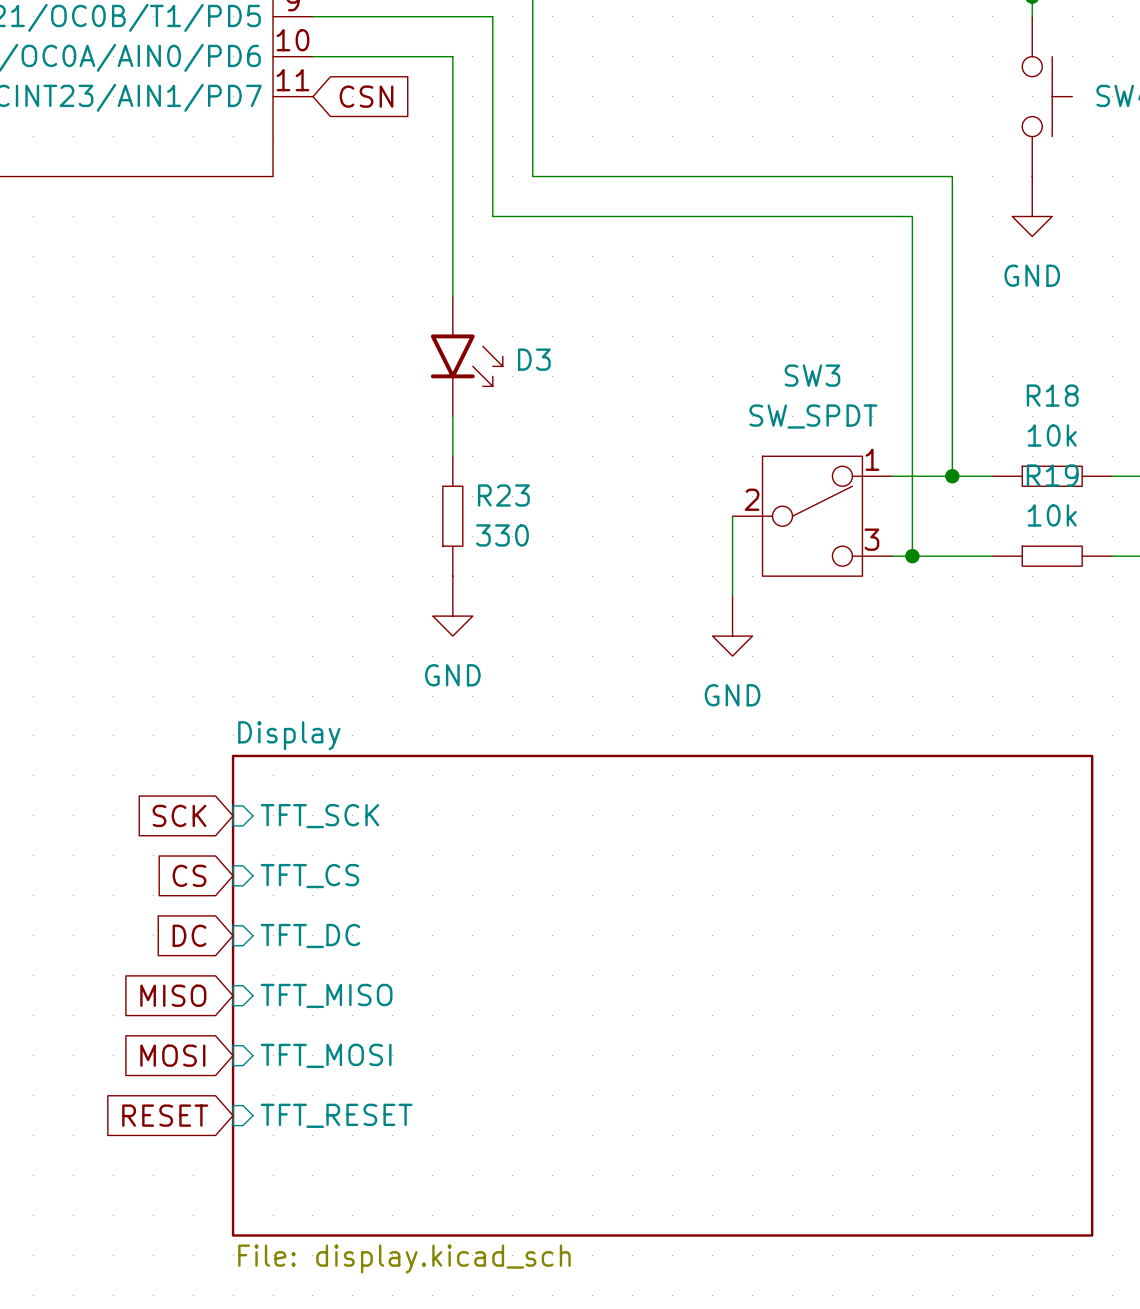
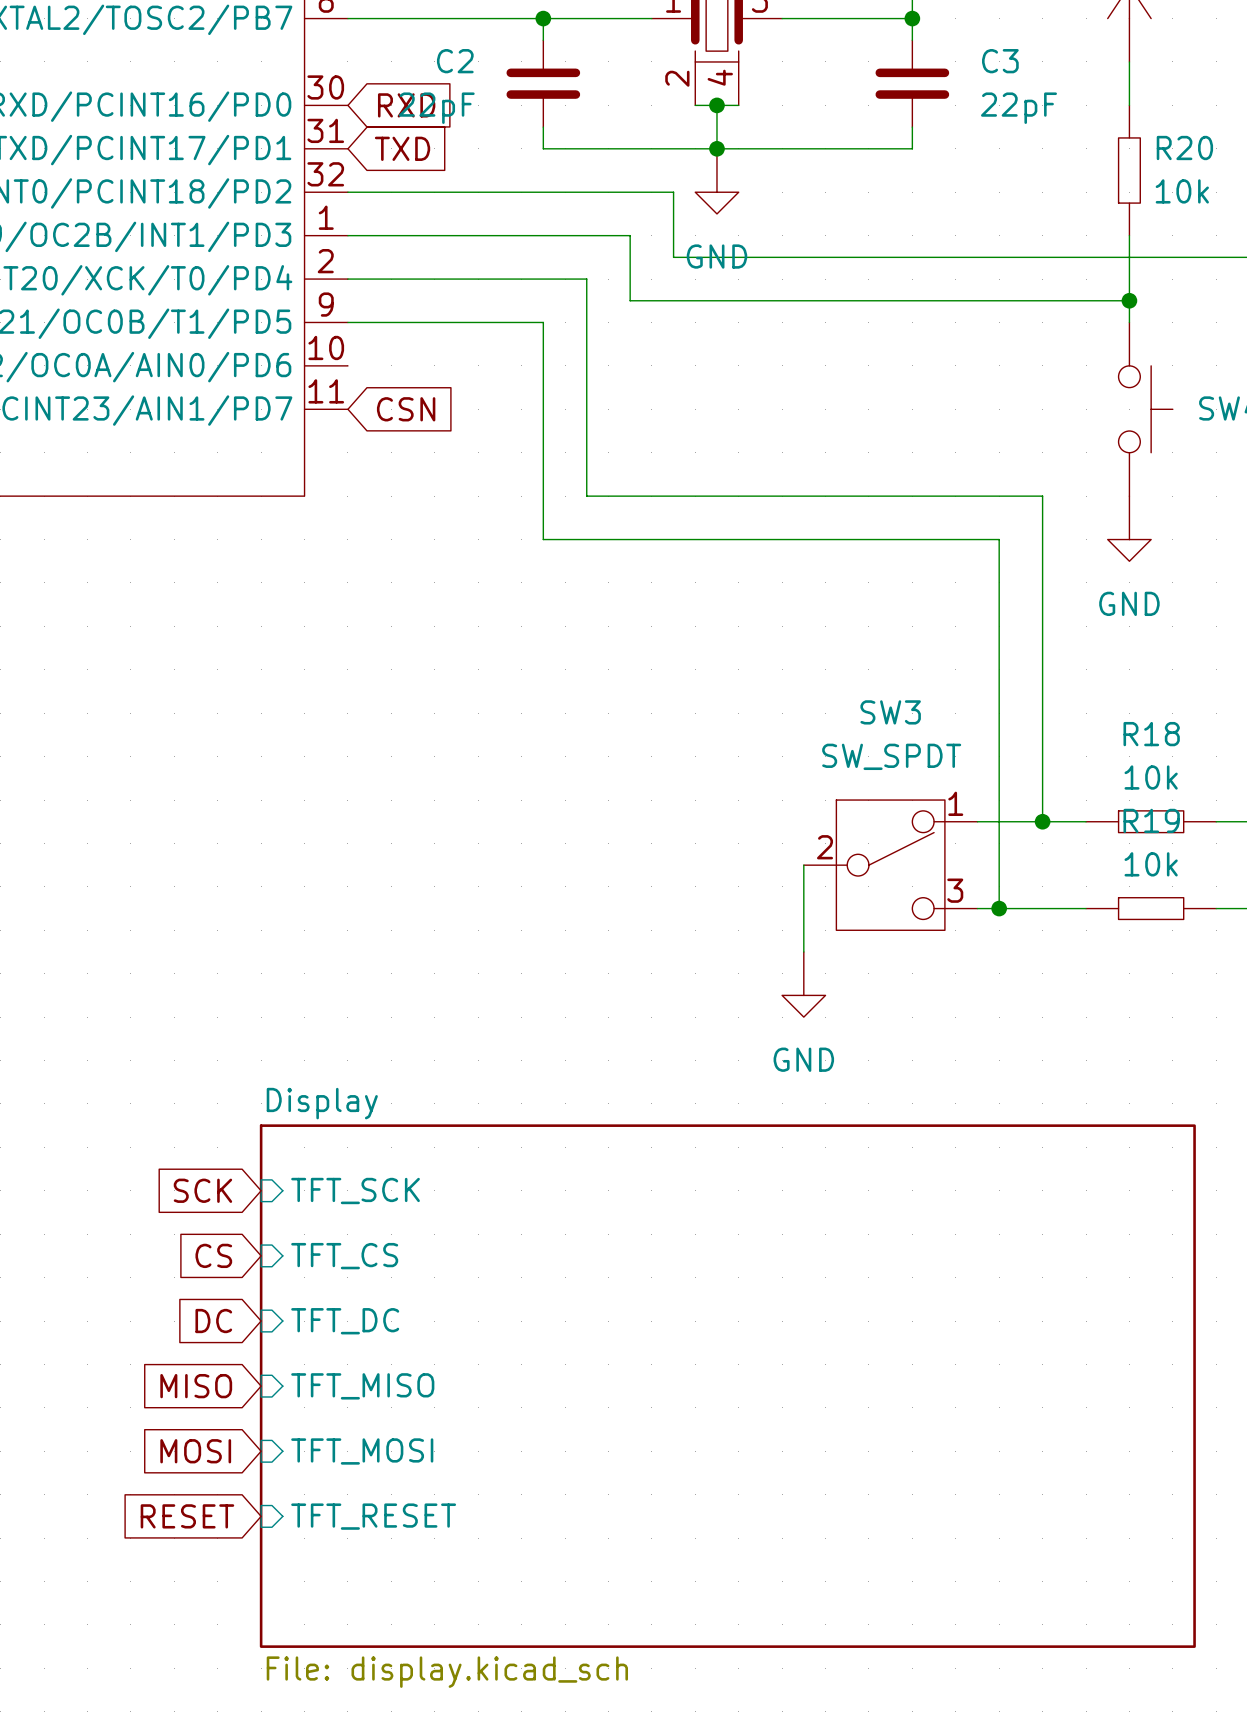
wire: (312, 56) (452, 56) (452, 296) -> none
D3: (466, 356) -> none
wire: (452, 416) (452, 456) -> none
R23: 330 (452, 516) -> none
power symbol: GND (452, 606) -> none

